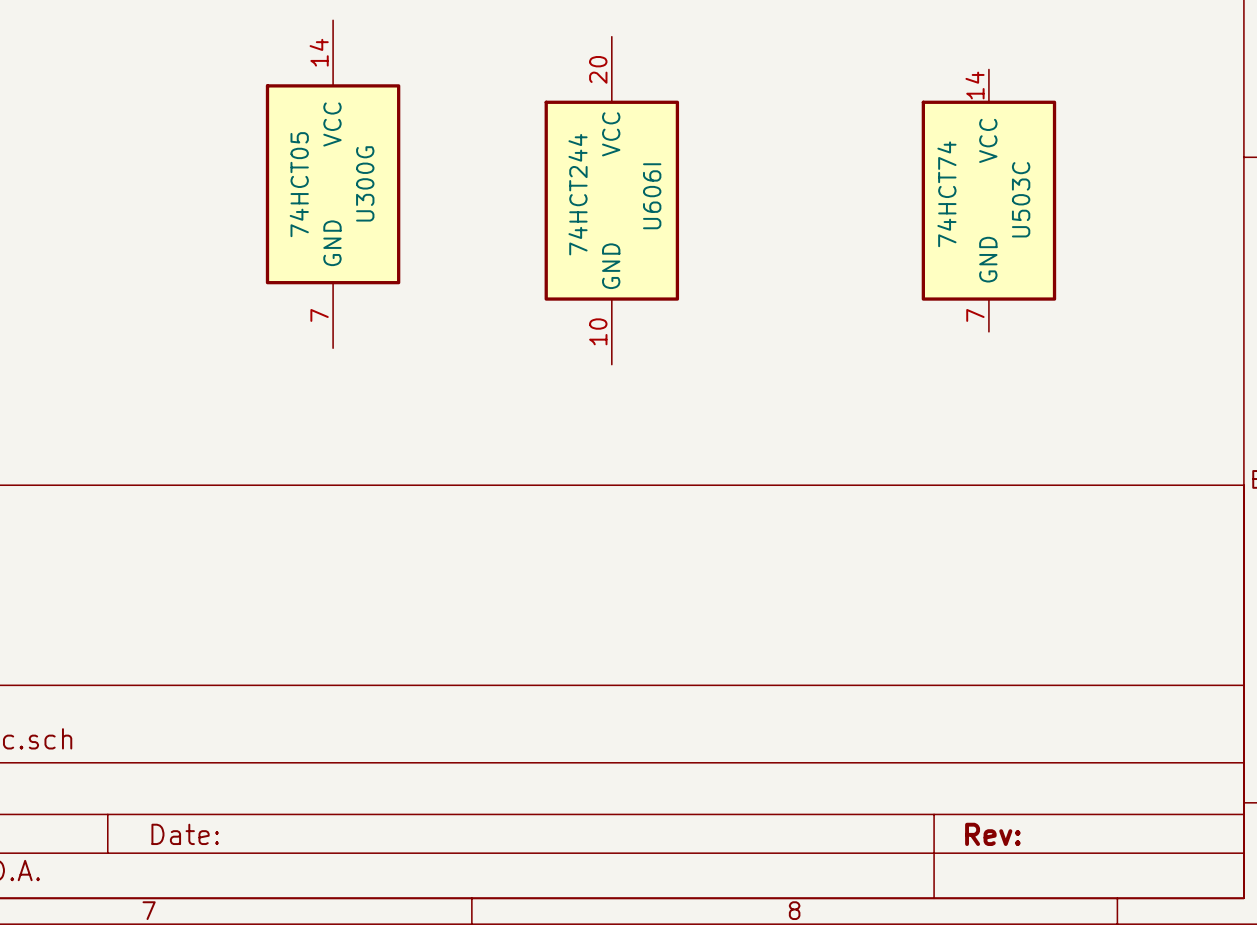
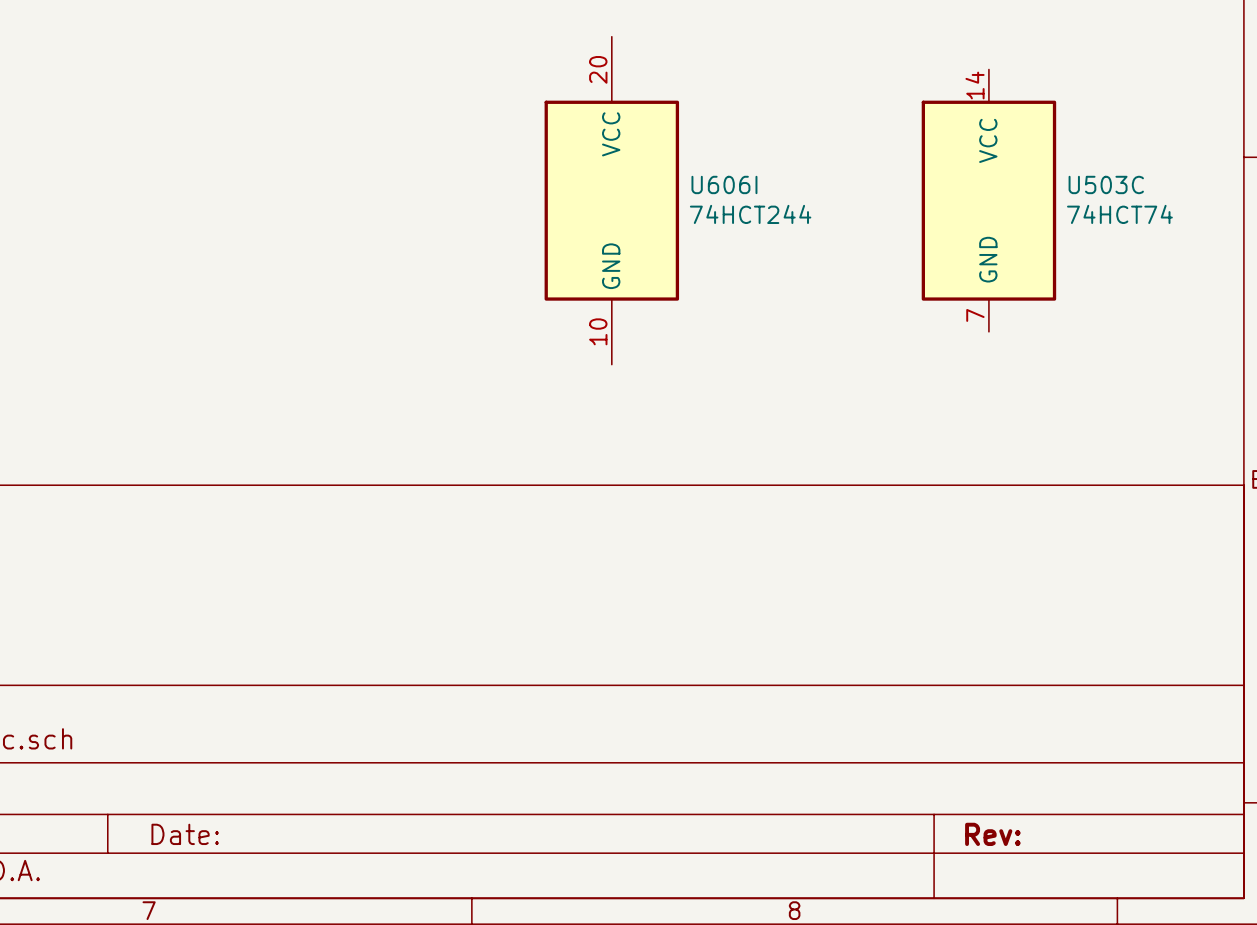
U300G: 74HCT05 (333, 184) -> none
U606I value rotation: 0° (578, 194) -> 90° clockwise (750, 214)
U606I value position: 74HCT244 (578, 194) -> 74HCT244 (750, 214)
U503C value rotation: 0° (946, 194) -> 90° clockwise (1119, 214)
U503C value position: 74HCT74 (946, 194) -> 74HCT74 (1119, 214)
U606I name rotation: 0° (652, 196) -> 90° clockwise (724, 184)
U503C name rotation: 0° (1021, 199) -> 90° clockwise (1106, 184)

